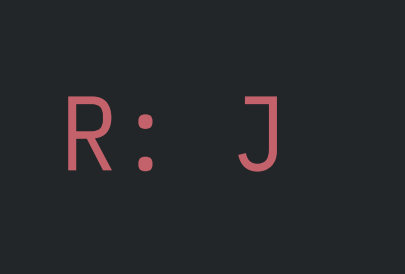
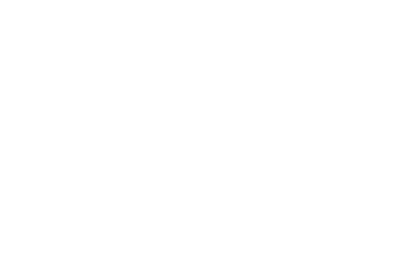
text: R: J (172, 134) -> none

